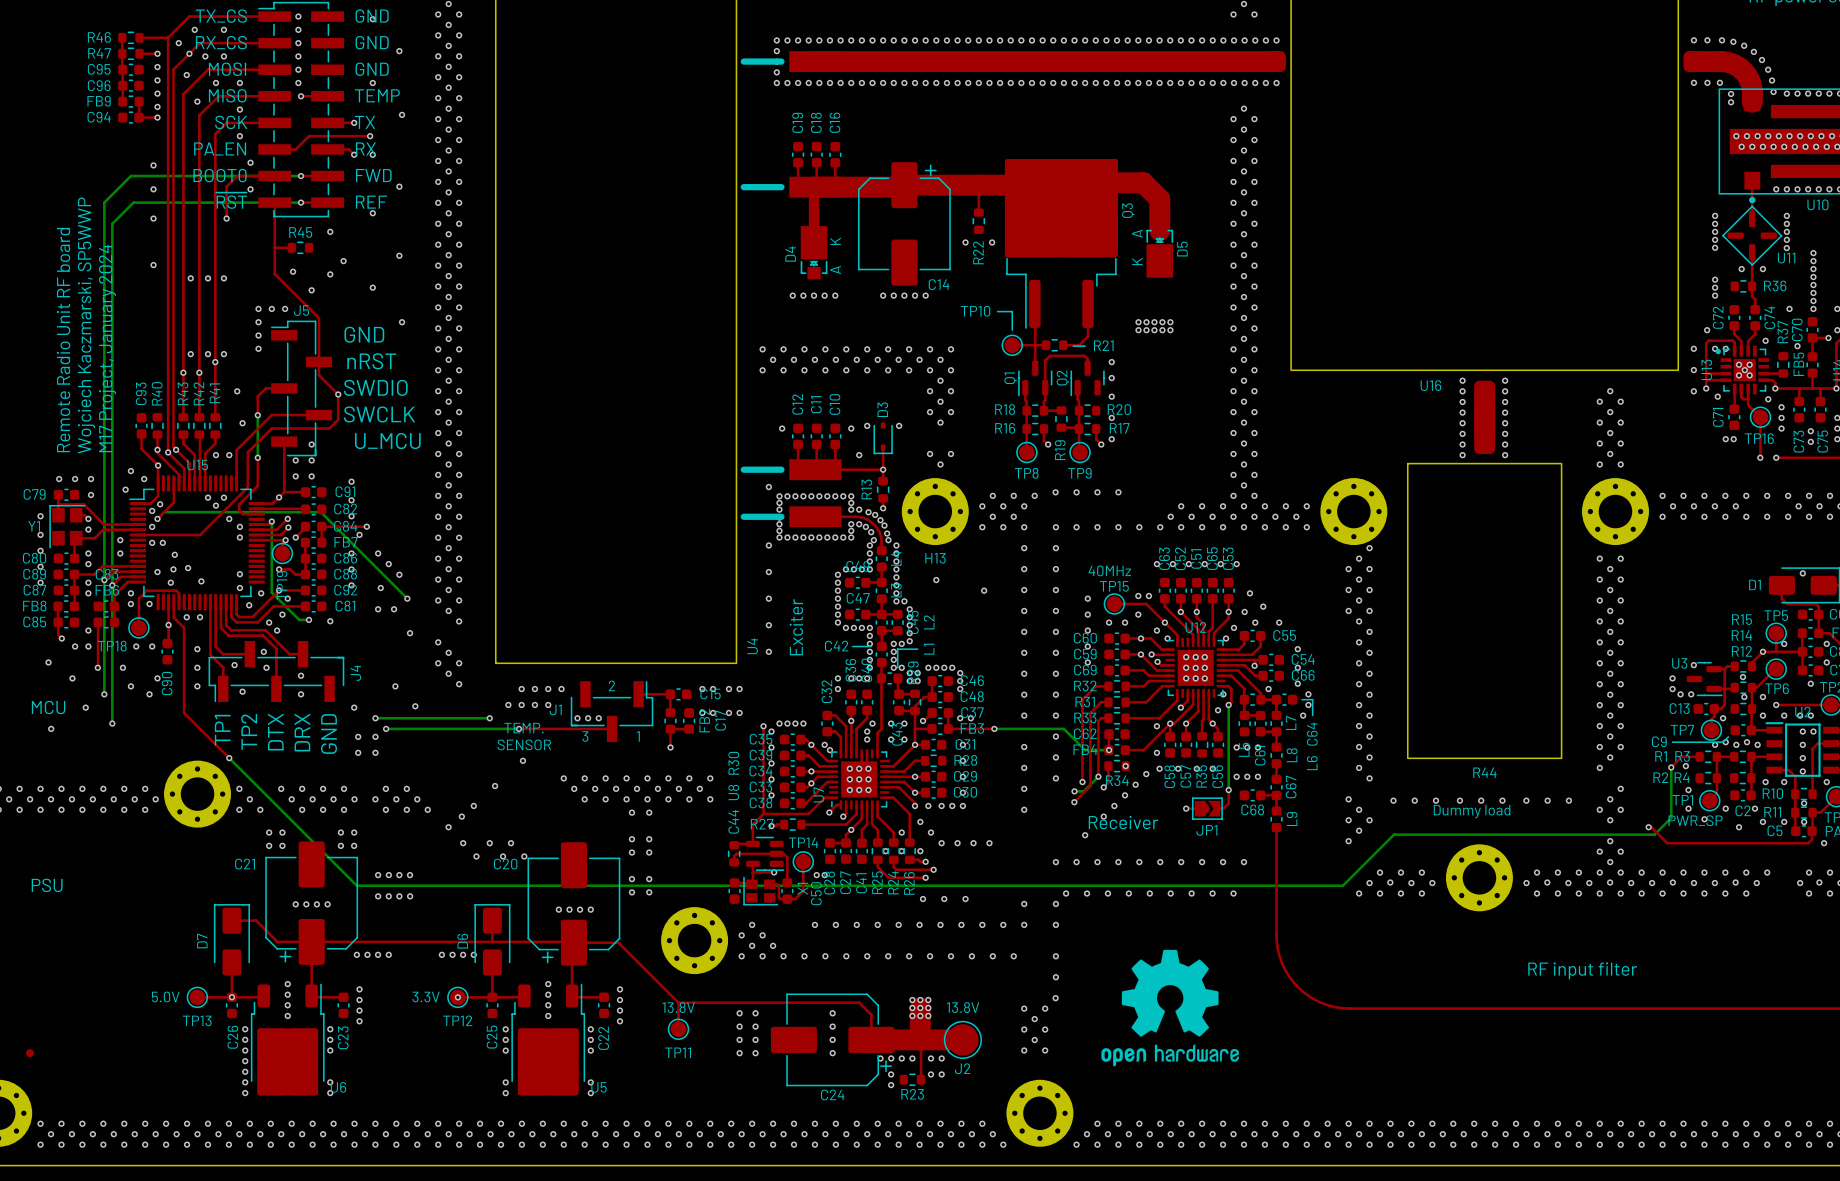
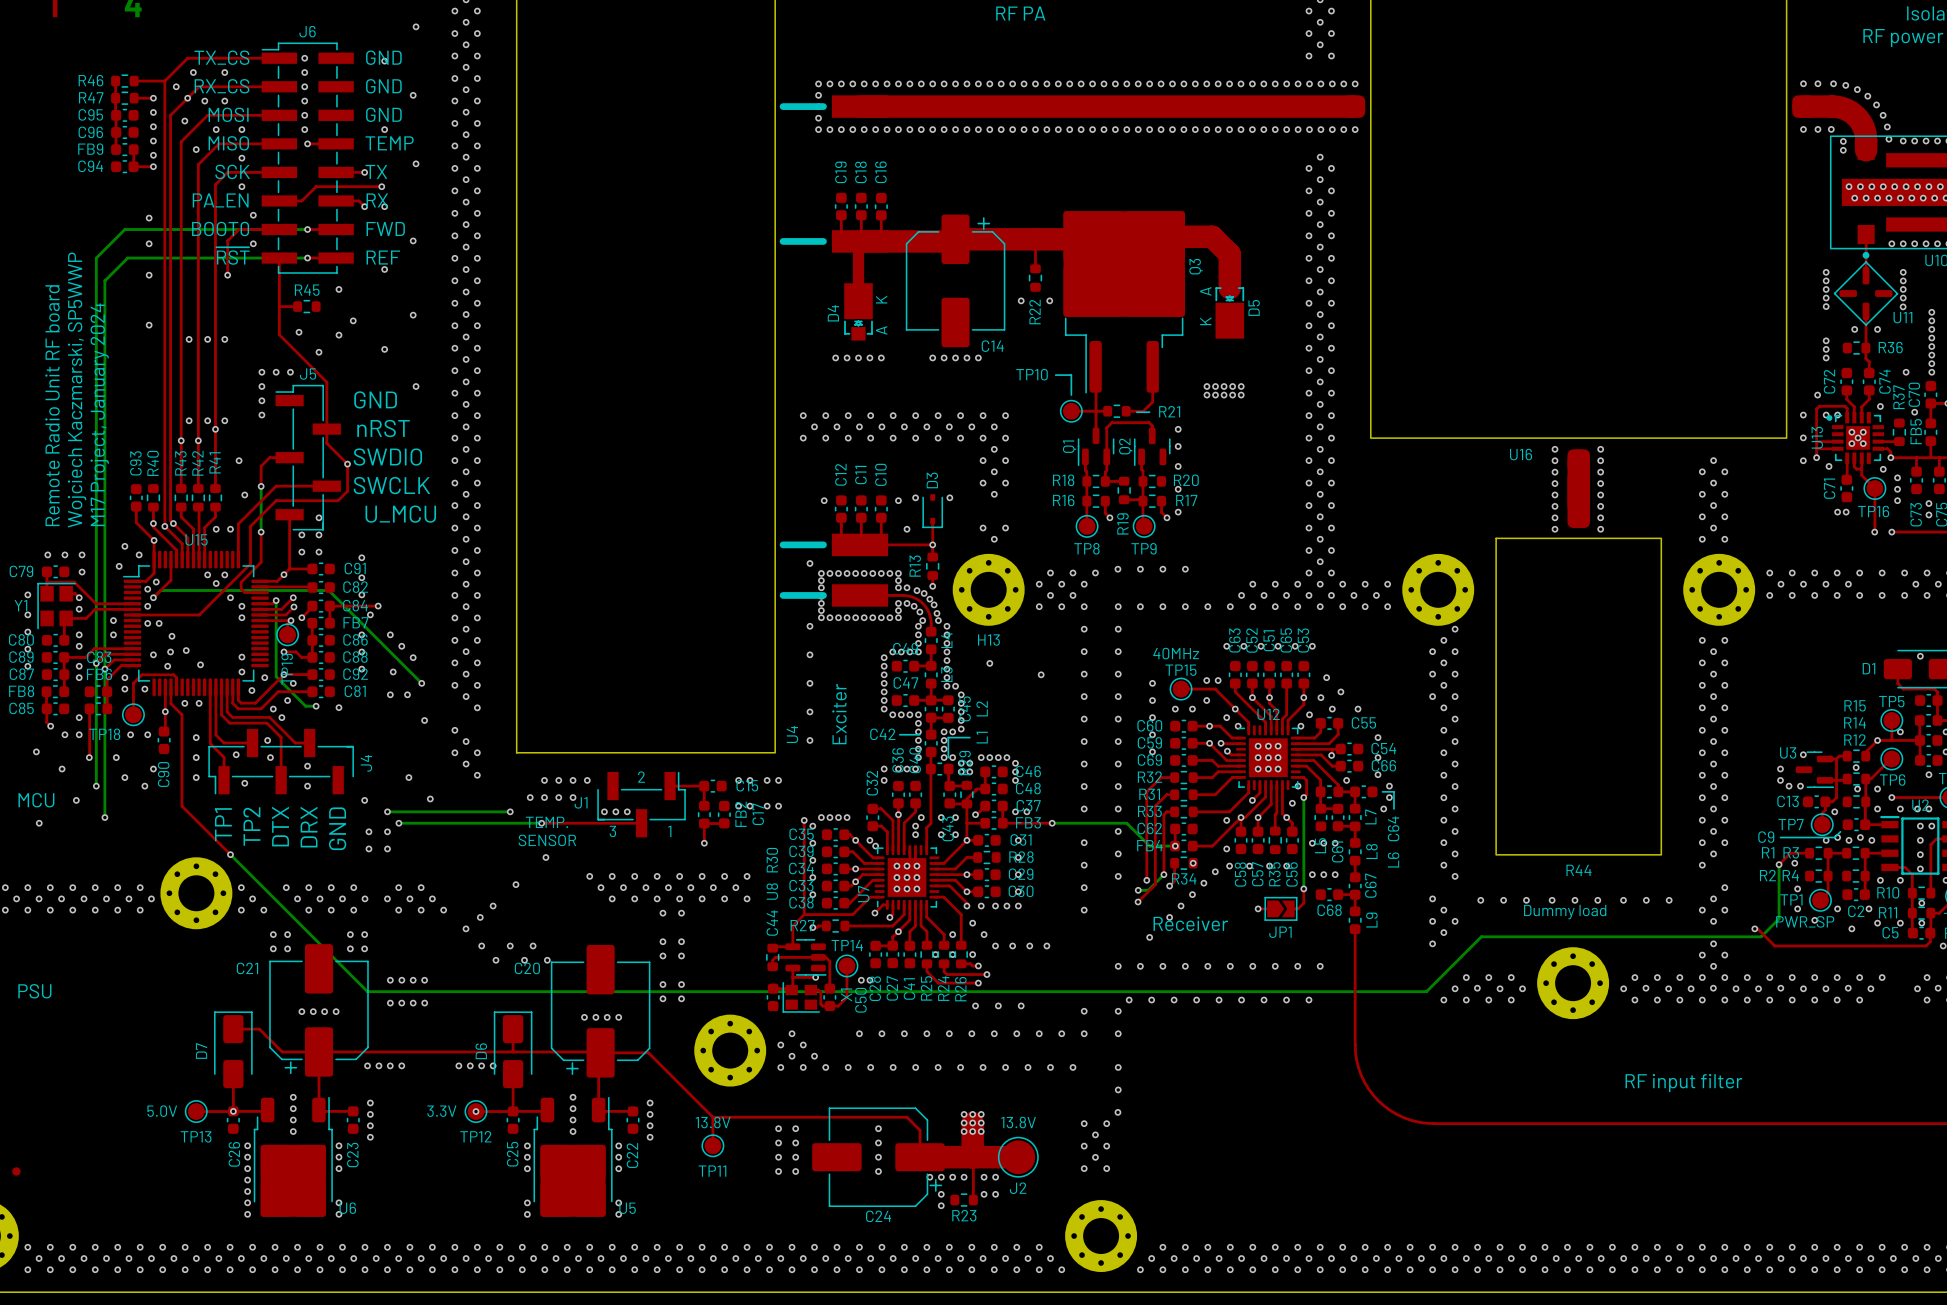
drawing: [1101, 949, 1240, 1067] -> none

